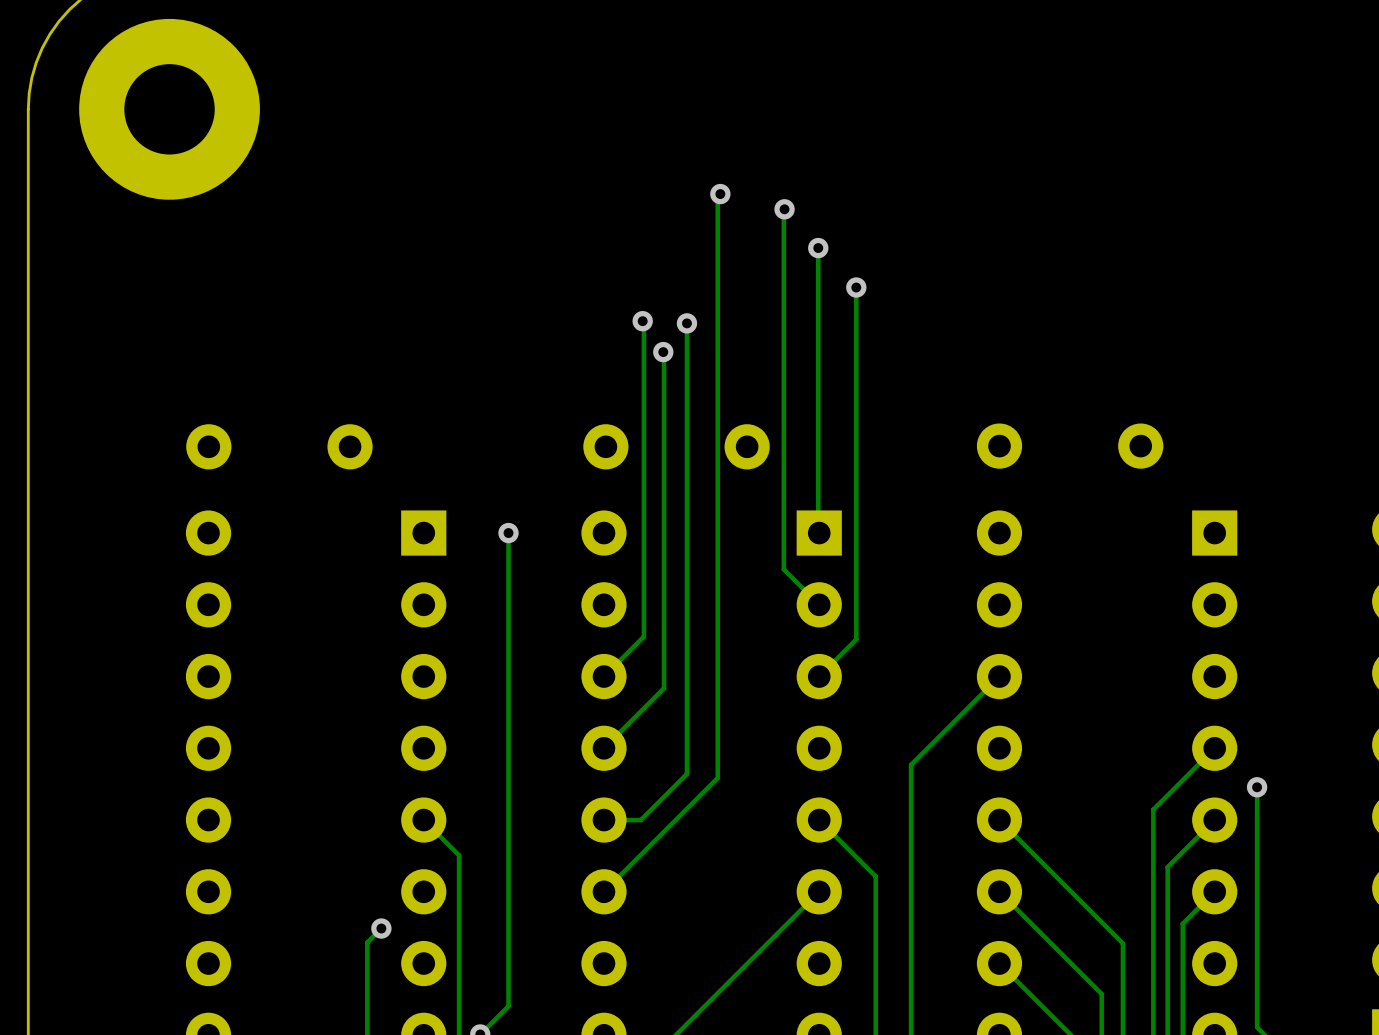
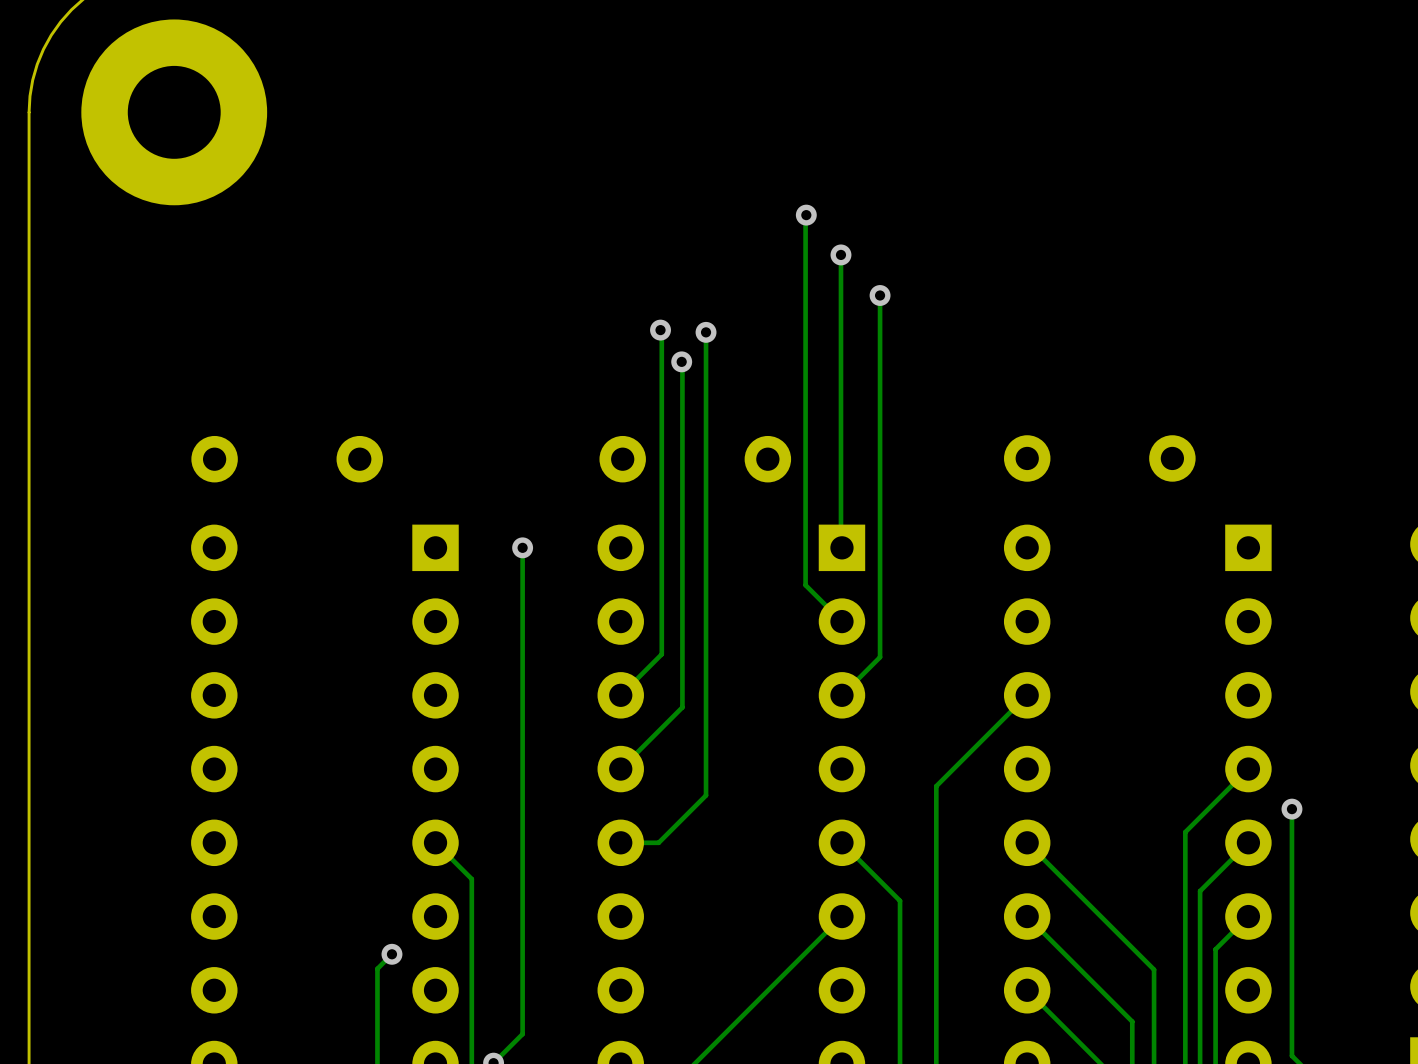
track: (720, 194) (717, 196) (717, 778) (603, 891) -> none
via: (720, 194) -> none

